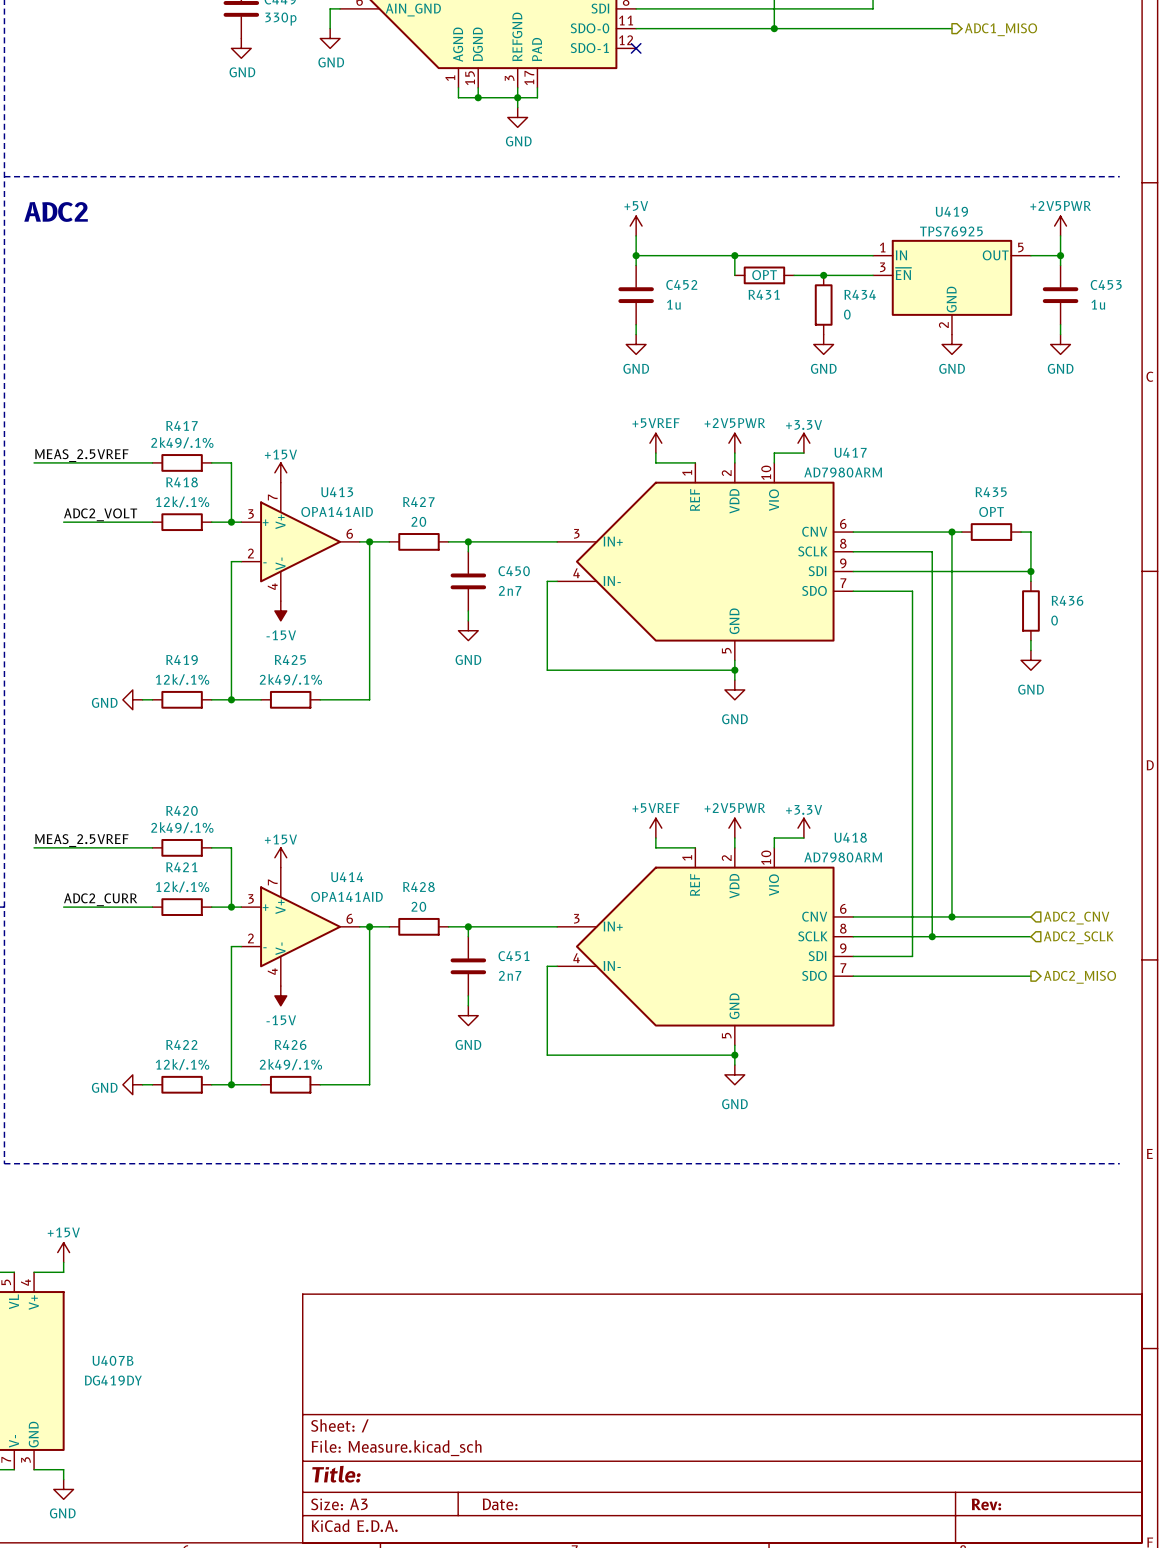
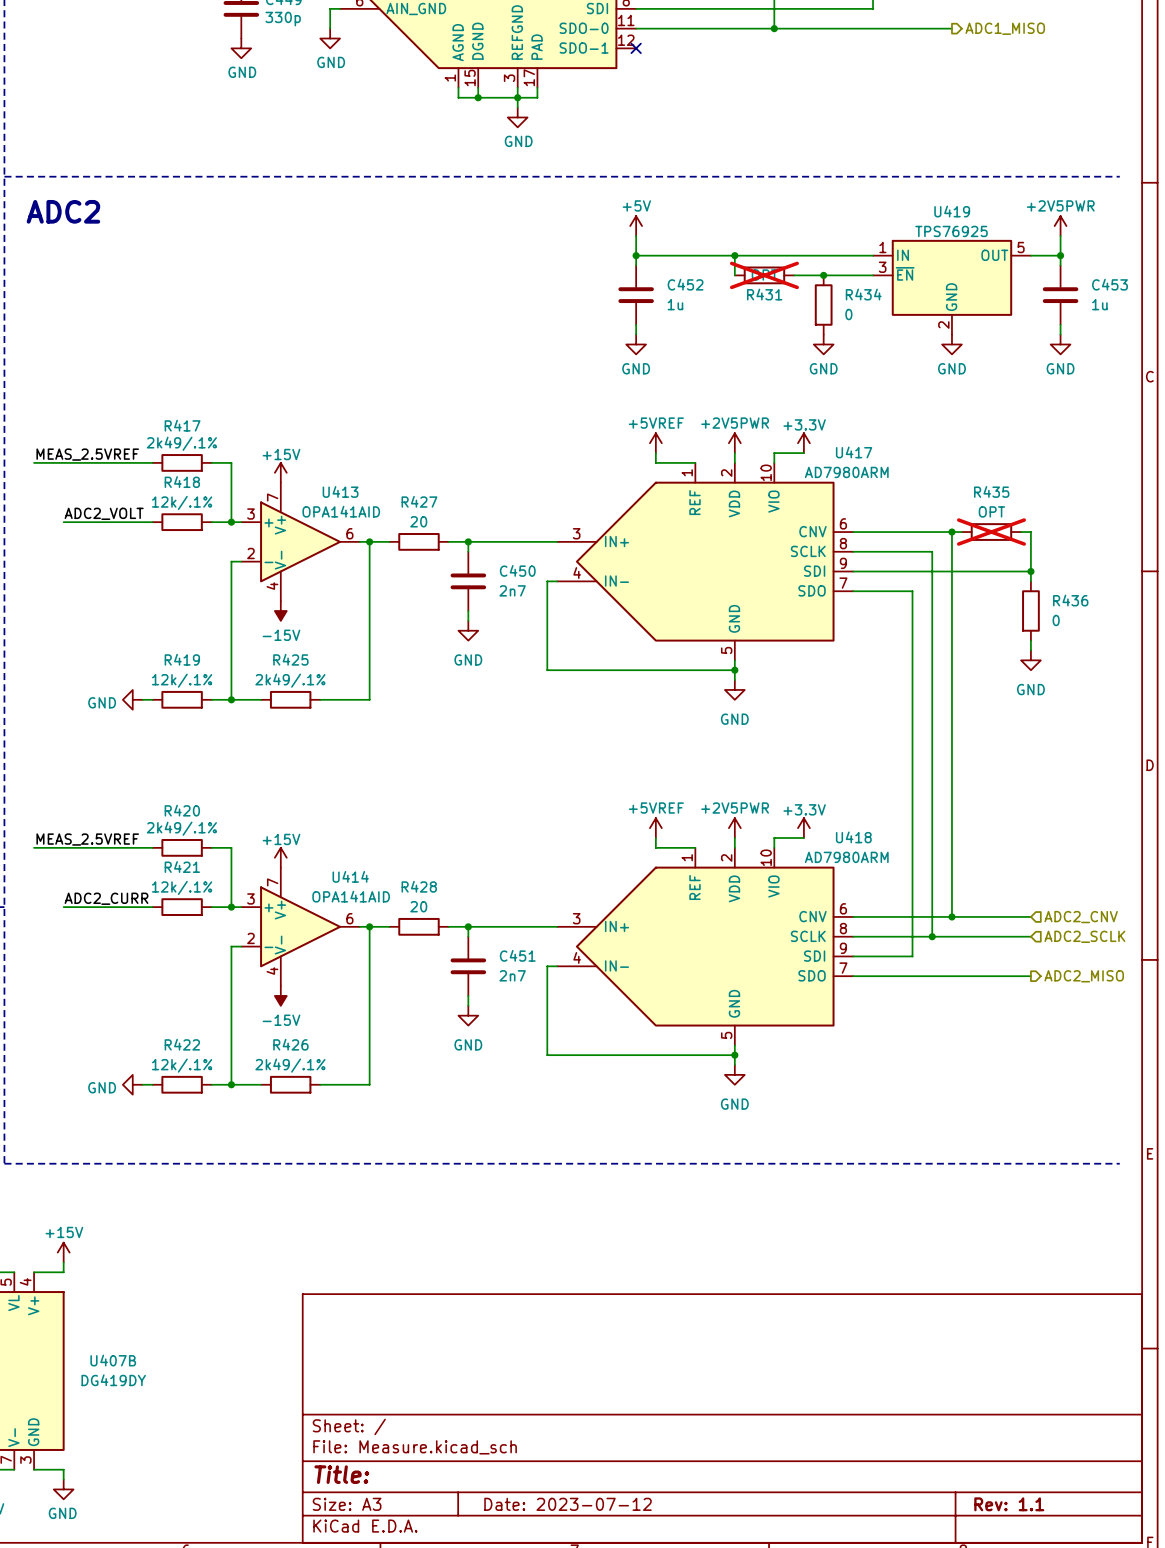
R431 do-not-place cross: none -> (764, 275)
R435 do-not-place cross: none -> (991, 532)
title block: Date: (500, 1504) -> Date: 2023-07-12 (568, 1504)
title block: Rev: (986, 1504) -> Rev: 1.1 (1009, 1504)

